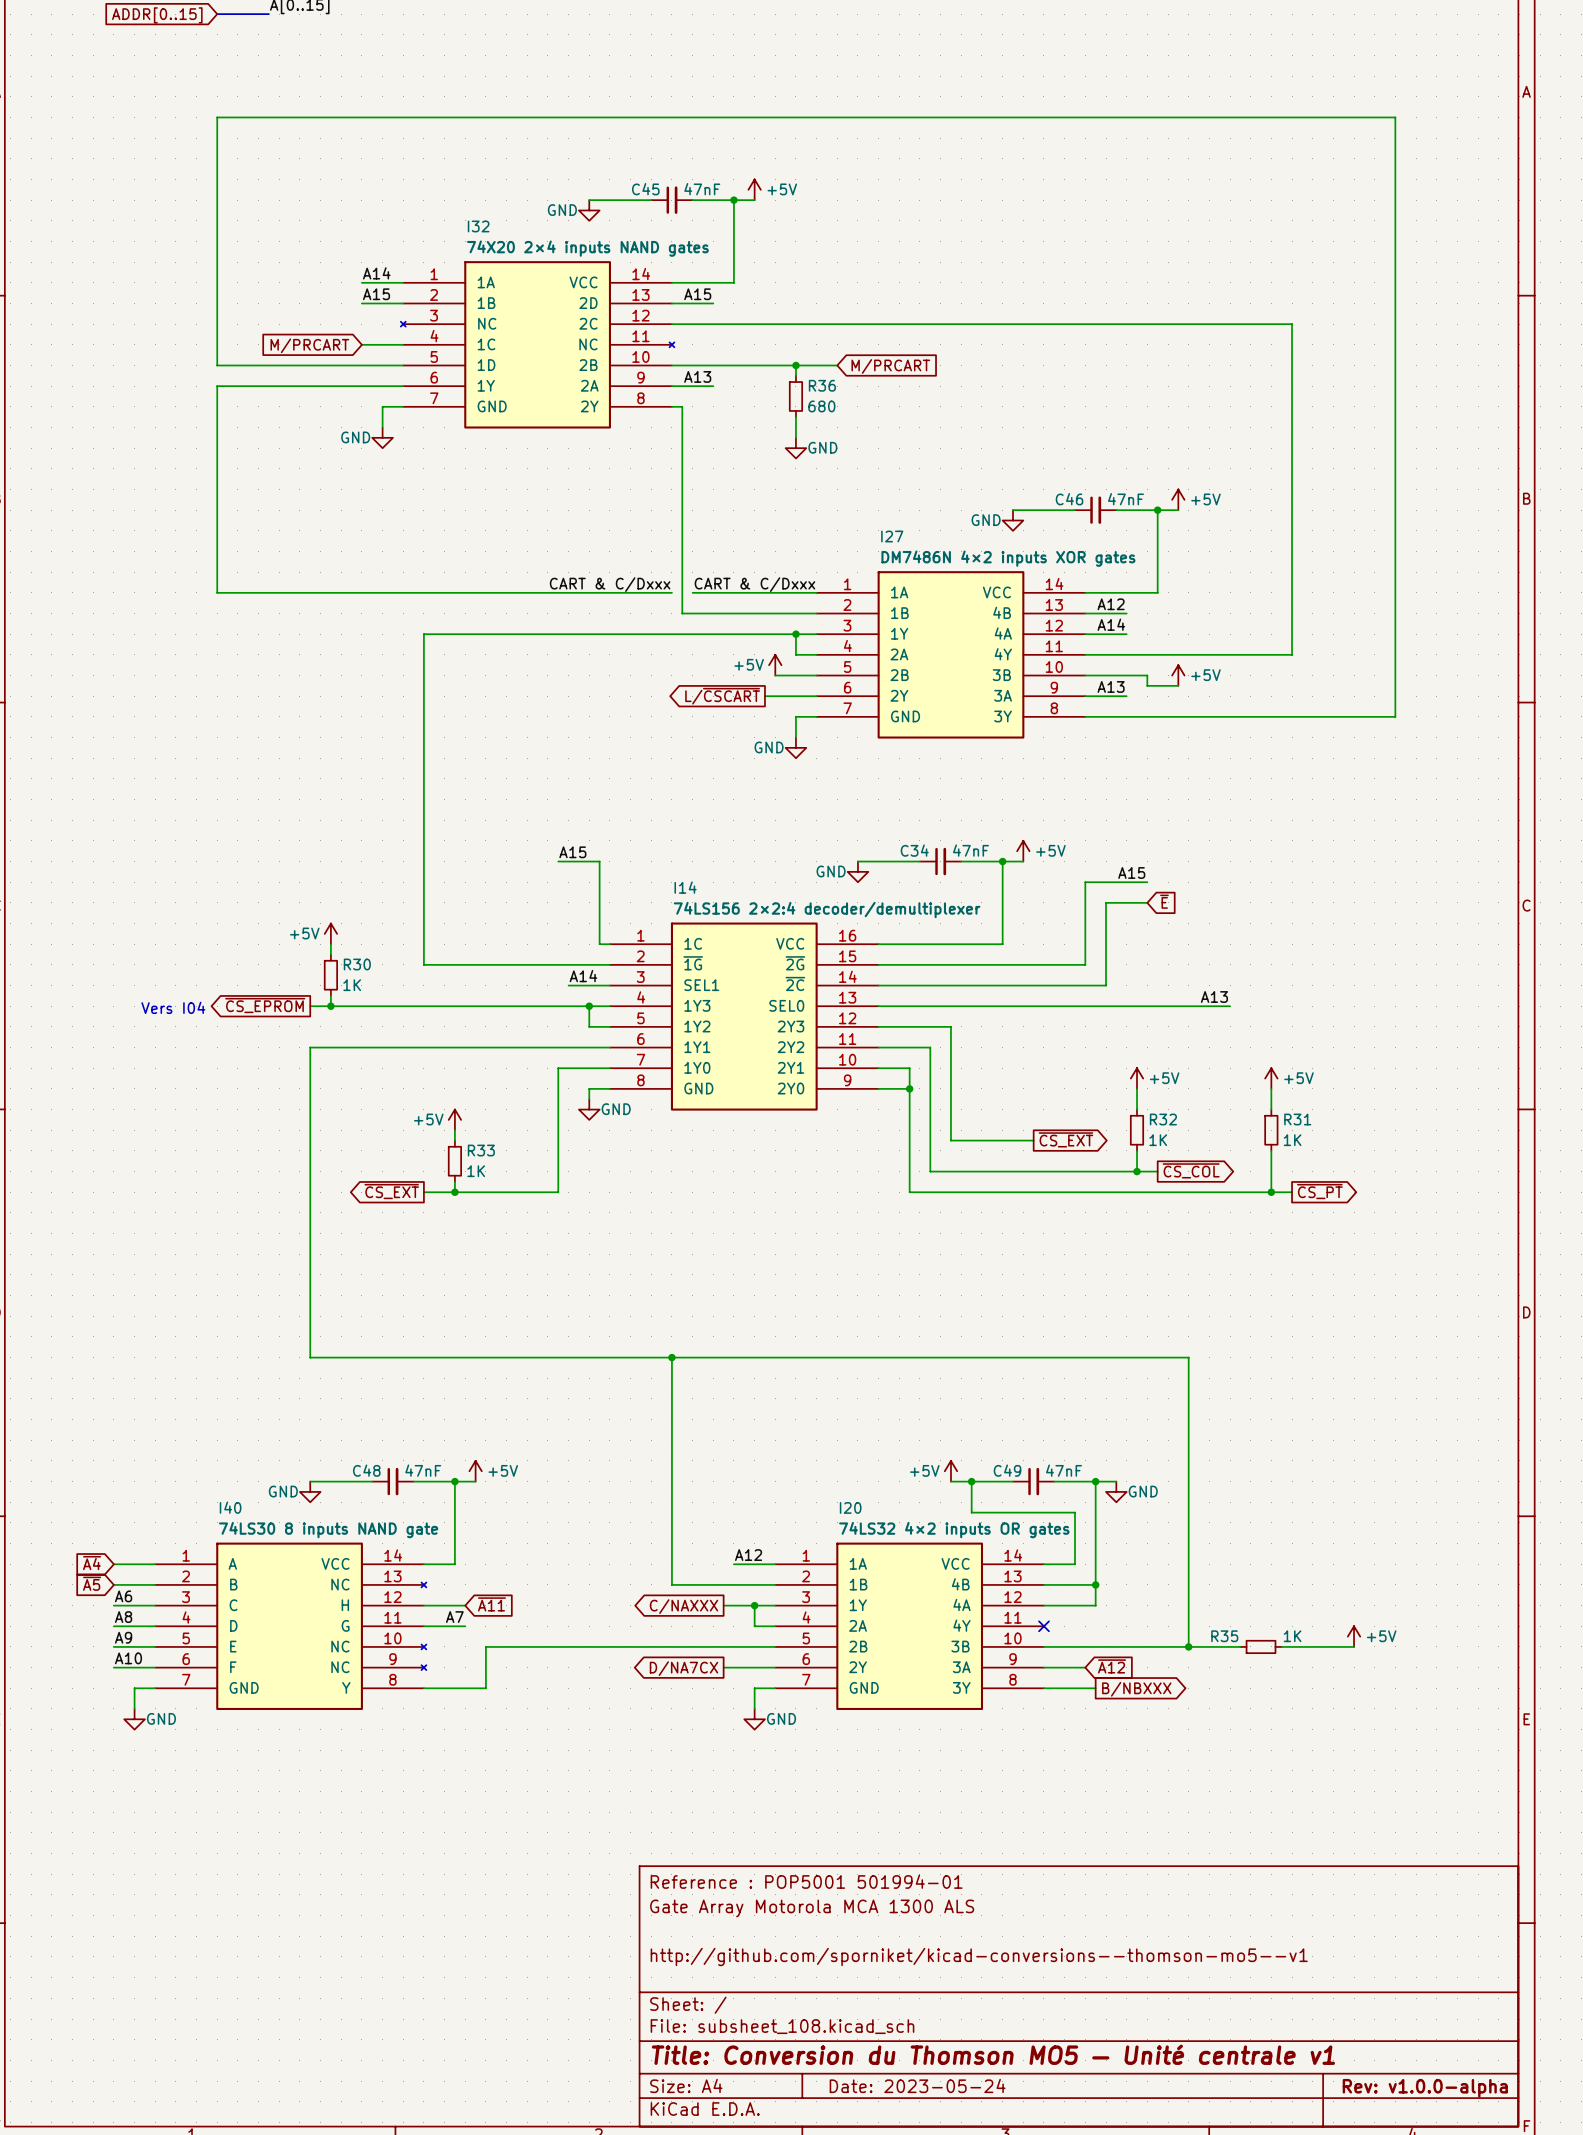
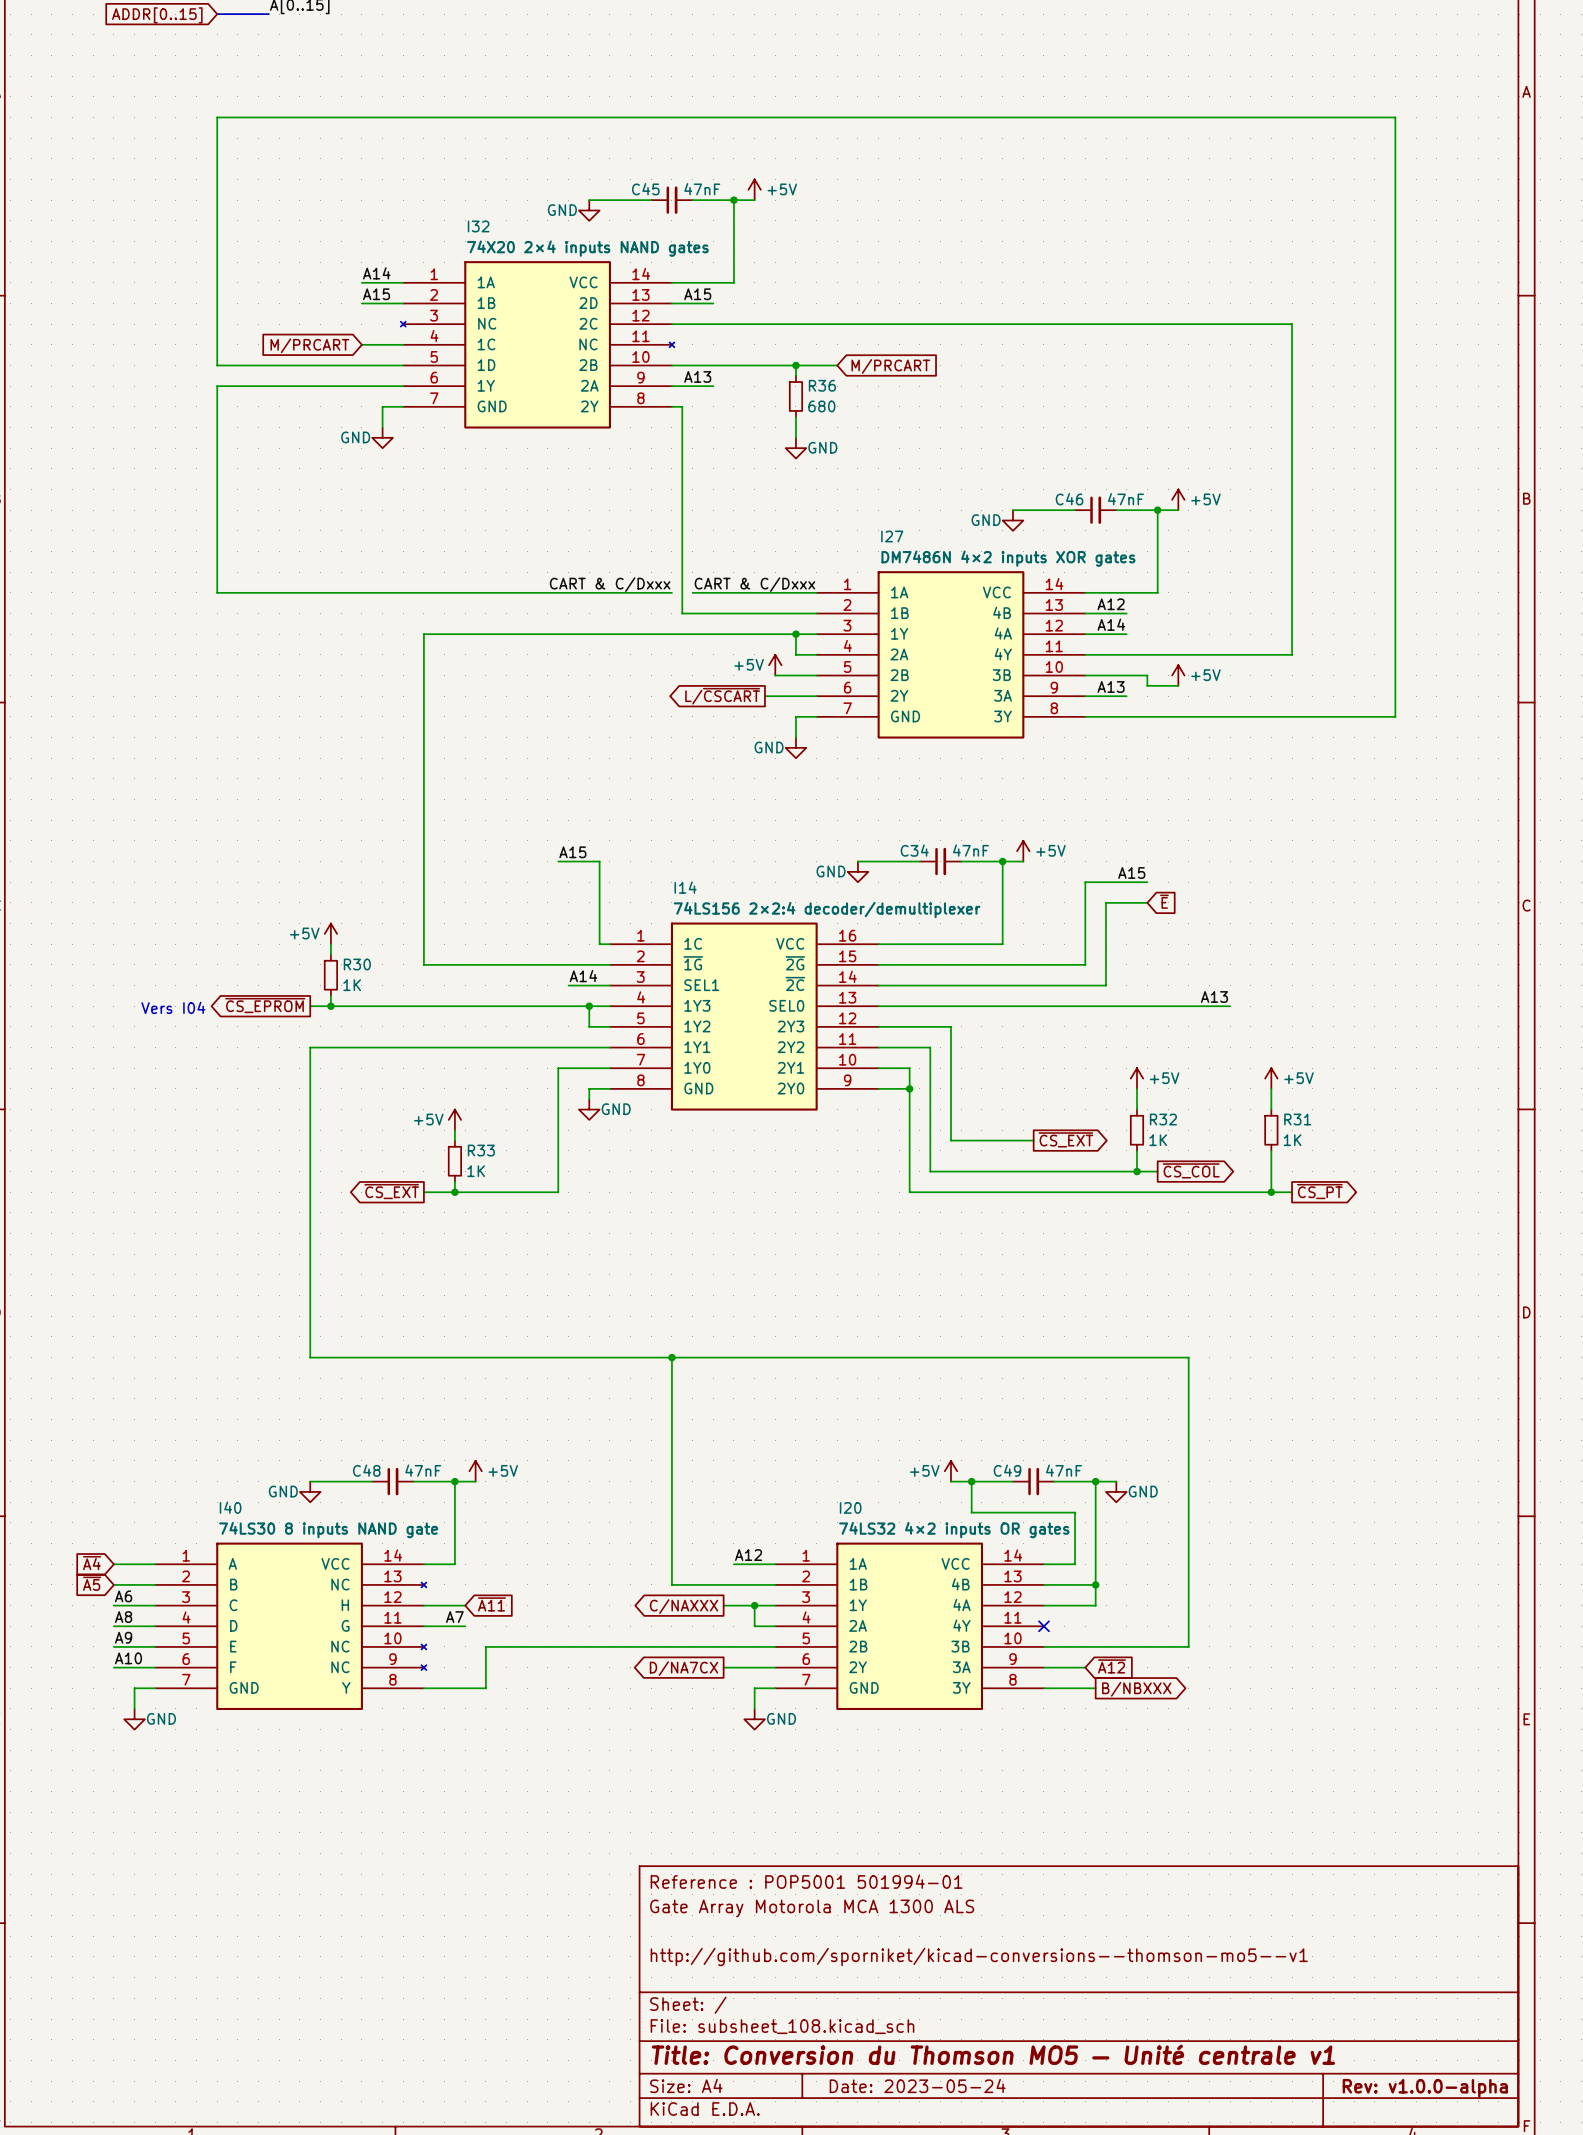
power symbol: +5V (1354, 1636) -> none
wire: (1188, 1646) (1240, 1646) -> none
junction: (1188, 1646) -> none
R35: 1K (1261, 1646) -> none
wire: (1281, 1646) (1354, 1646) -> none

